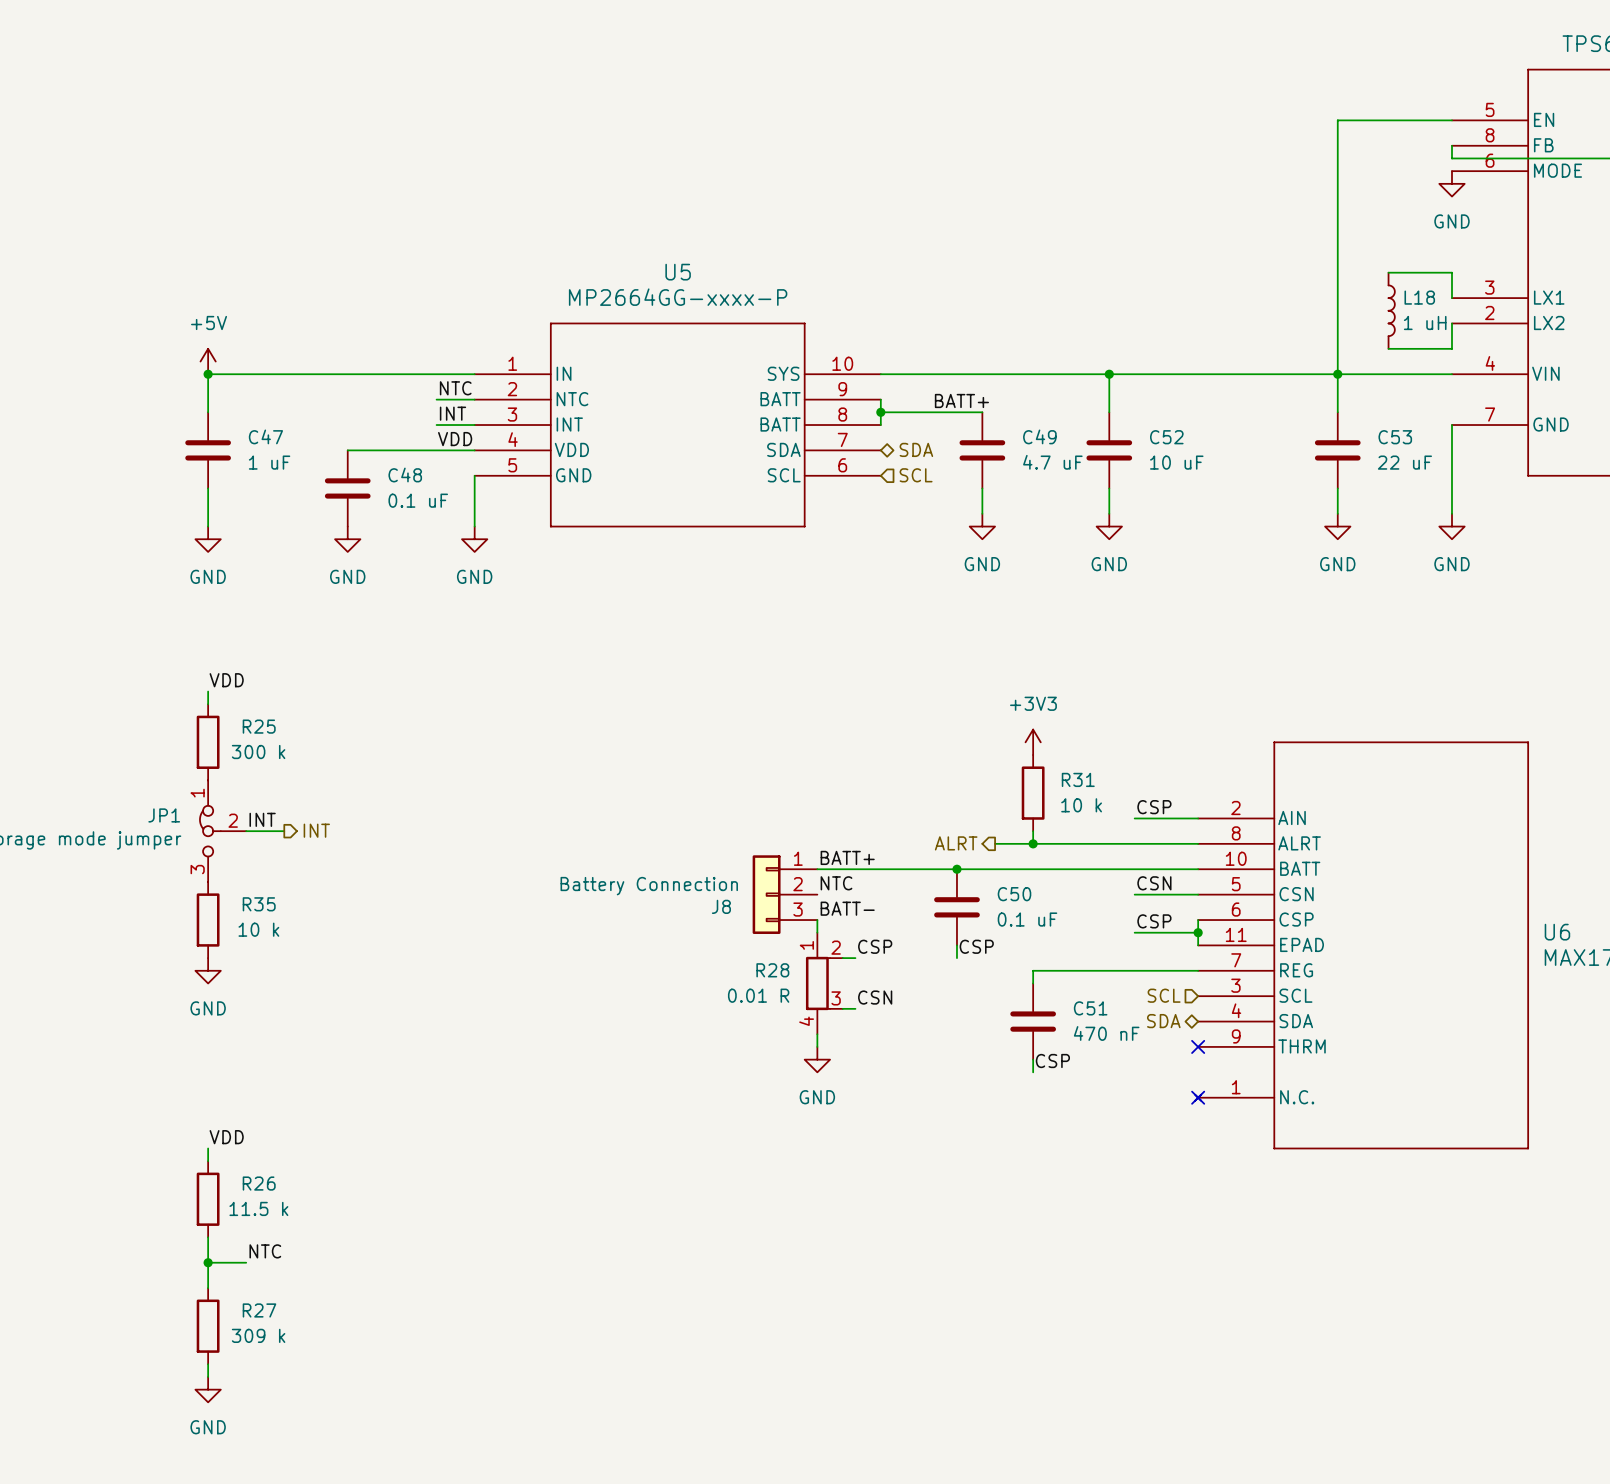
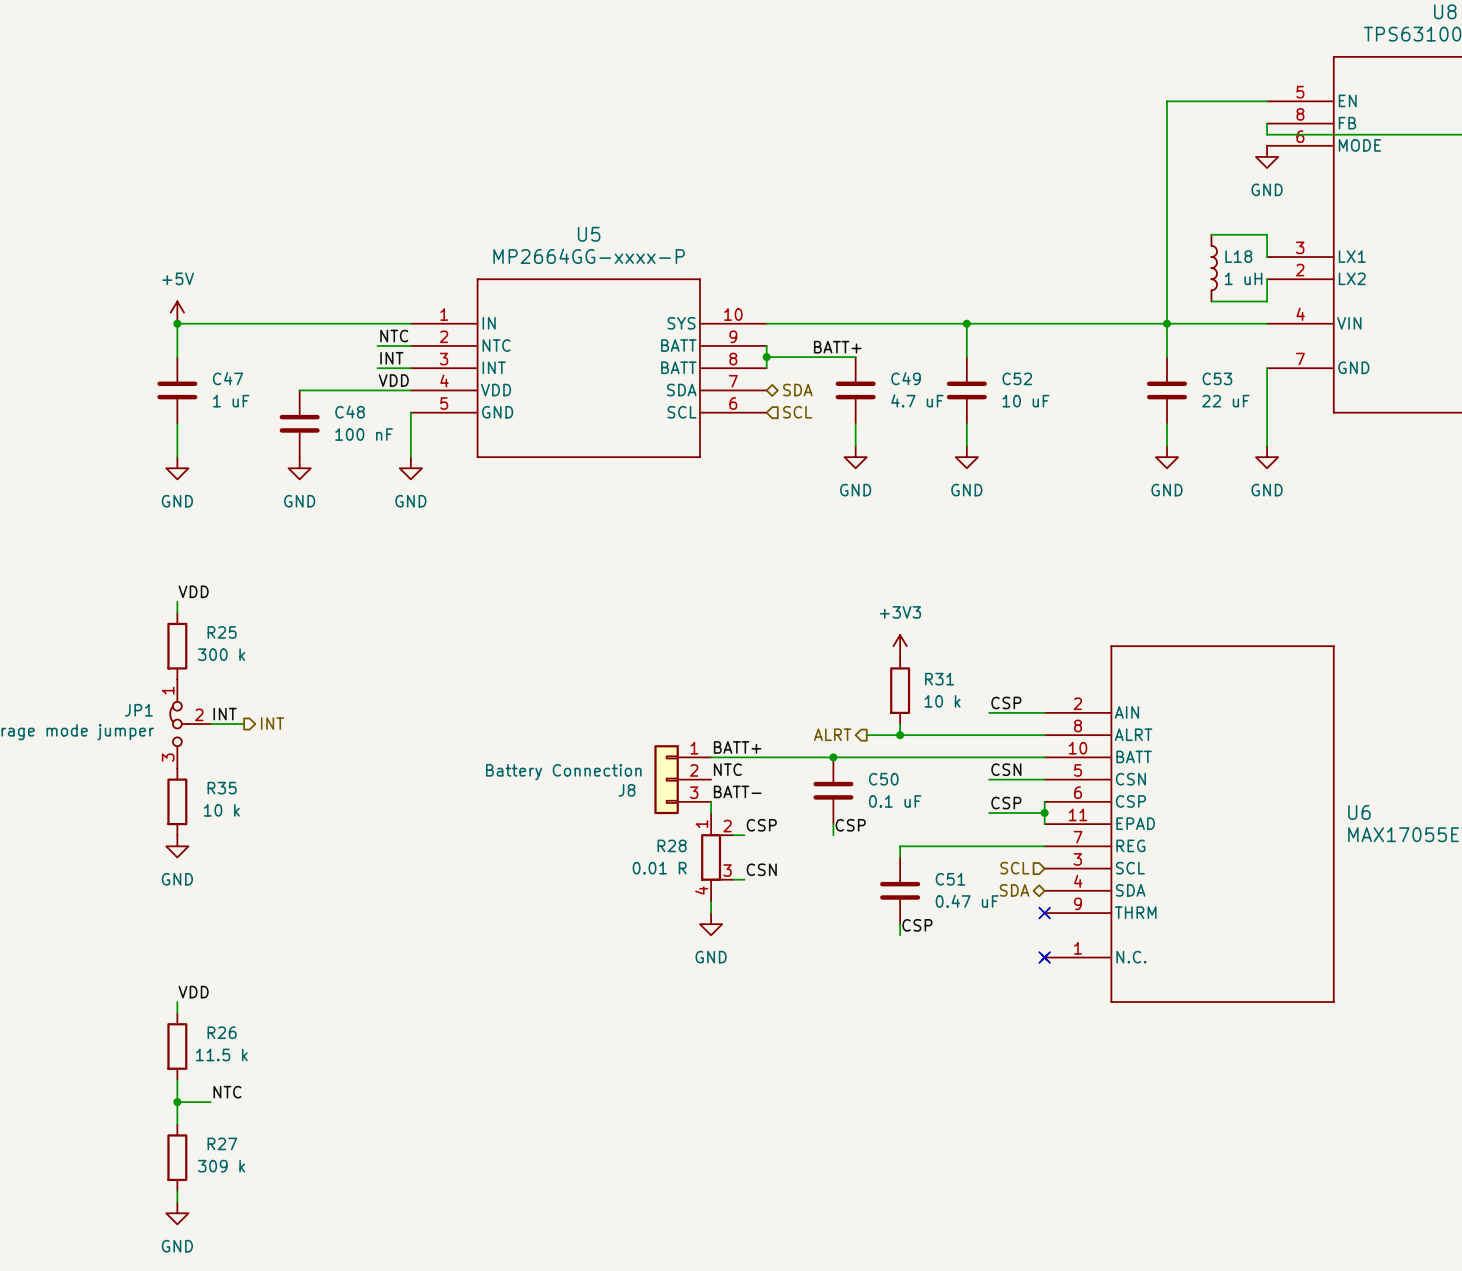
C48 value: 0.1 uF (418, 500) -> 100 nF (364, 434)
C51 value: 470 nF (1106, 1033) -> 0.47 uF (967, 901)

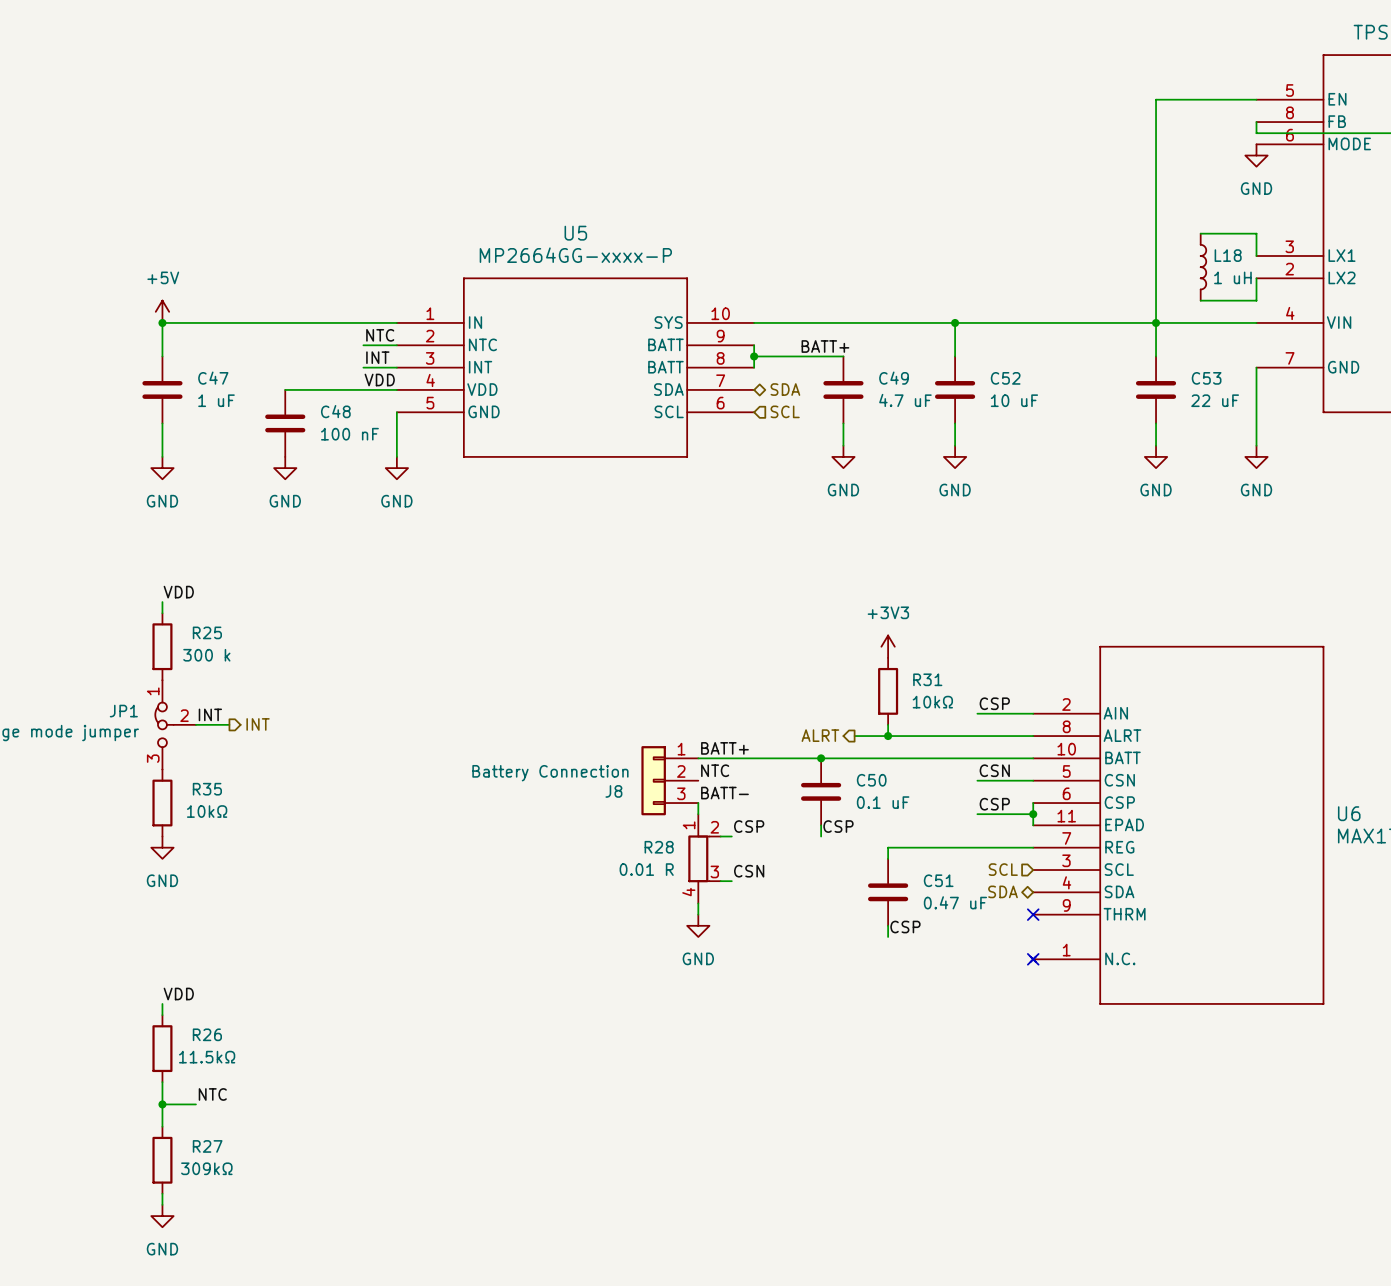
R31 value: 10 k (942, 701) -> 10kΩ (932, 702)
R35 value: 10 k (221, 810) -> 10kΩ (207, 811)
R26 value: 11.5 k (221, 1054) -> 11.5kΩ (207, 1057)
R27 value: 309 k (221, 1166) -> 309kΩ (206, 1168)

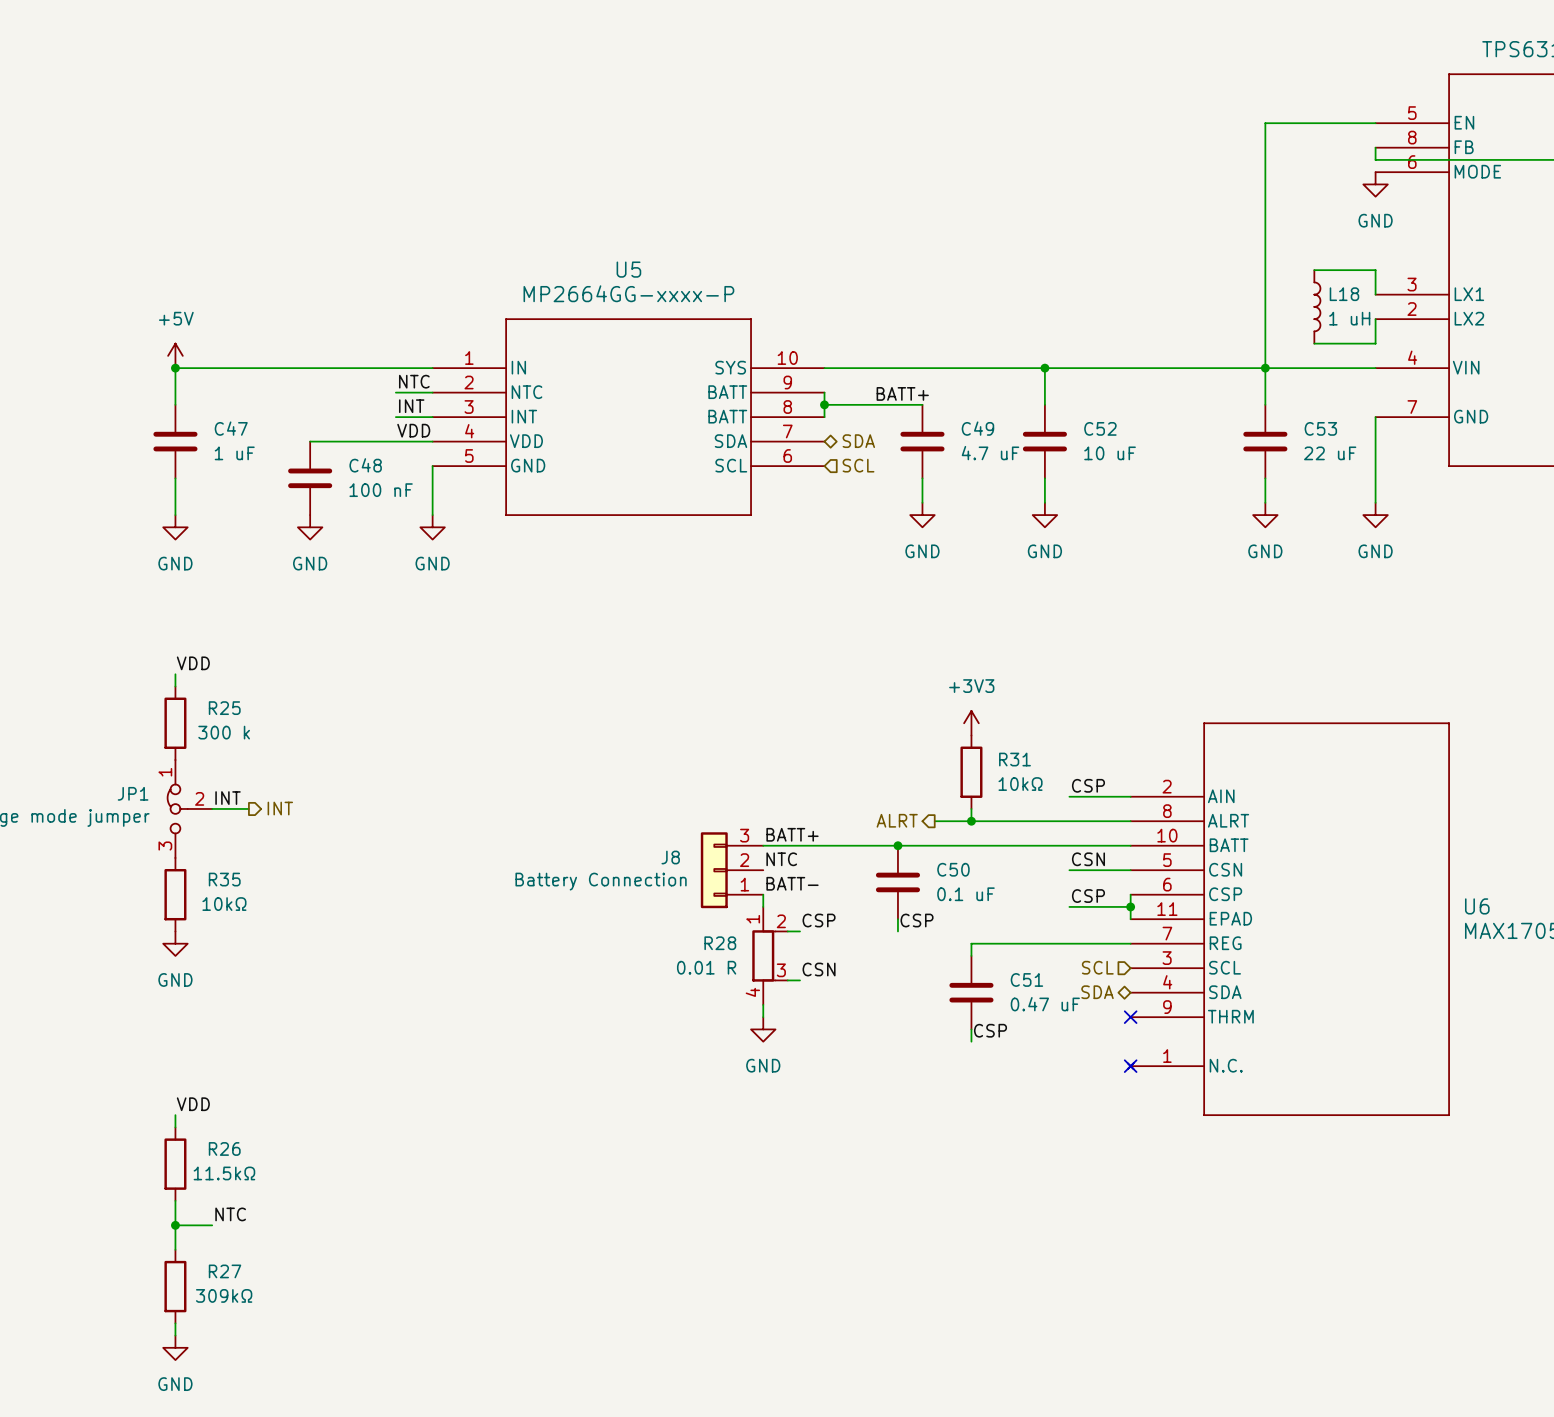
J8 flip: as is (653, 780) -> up-down (714, 870)

